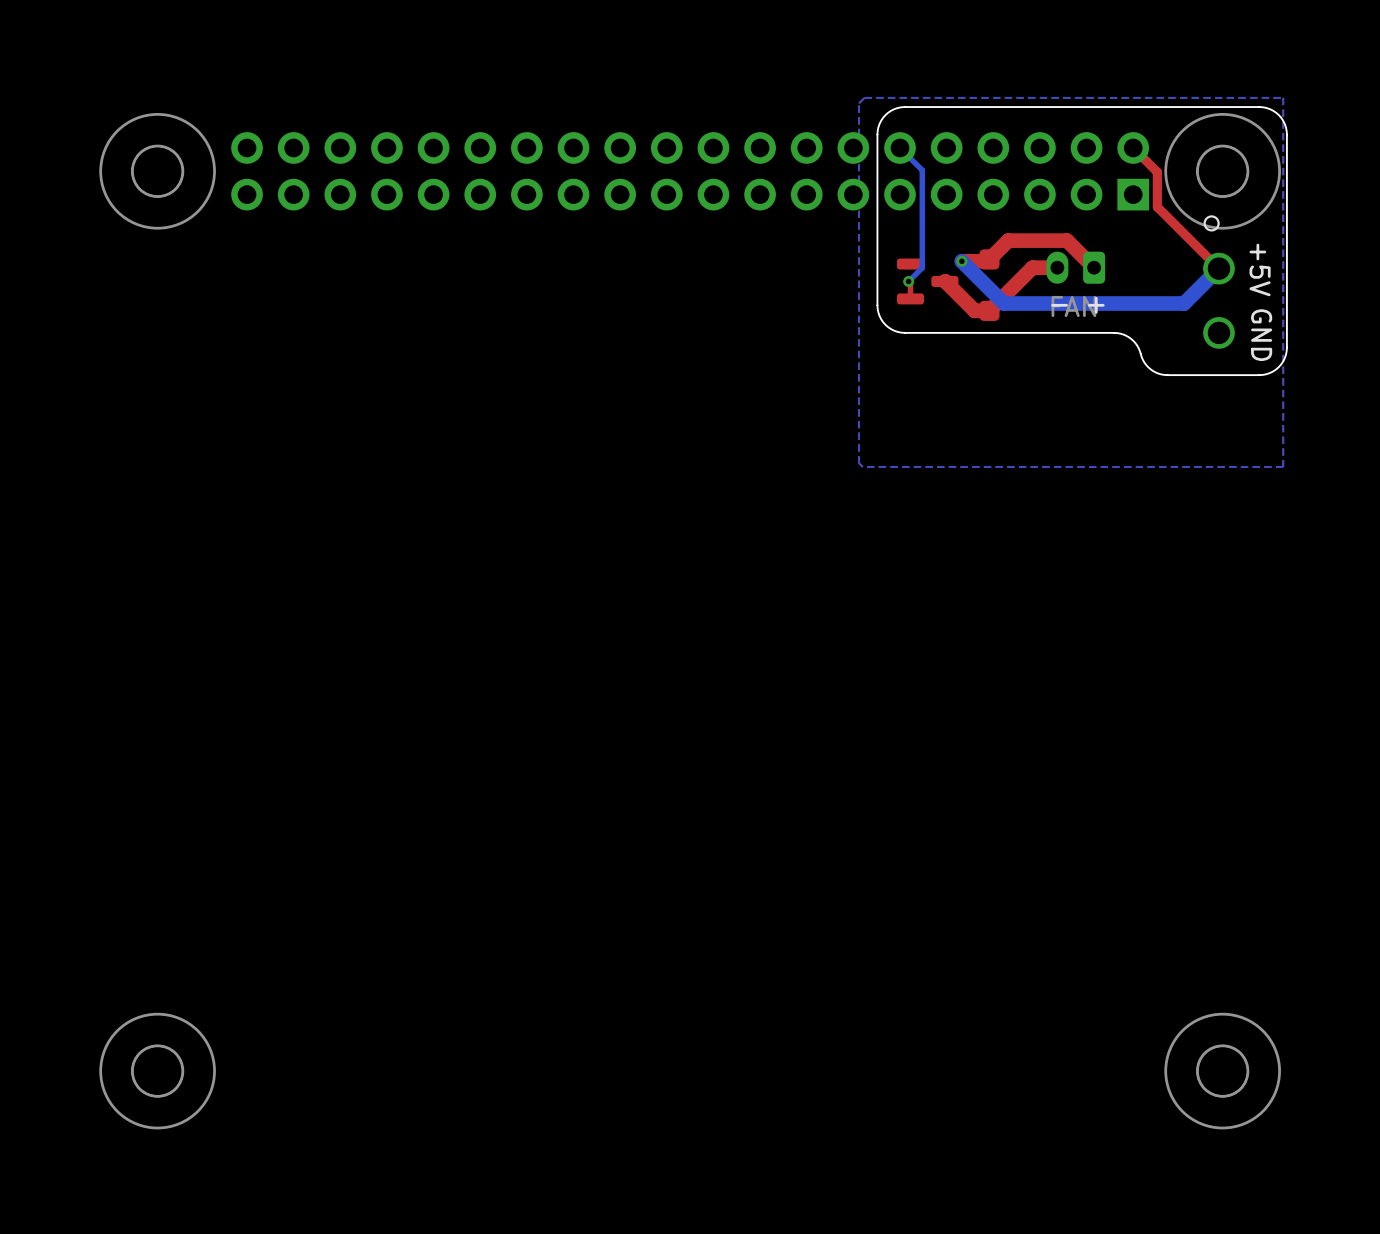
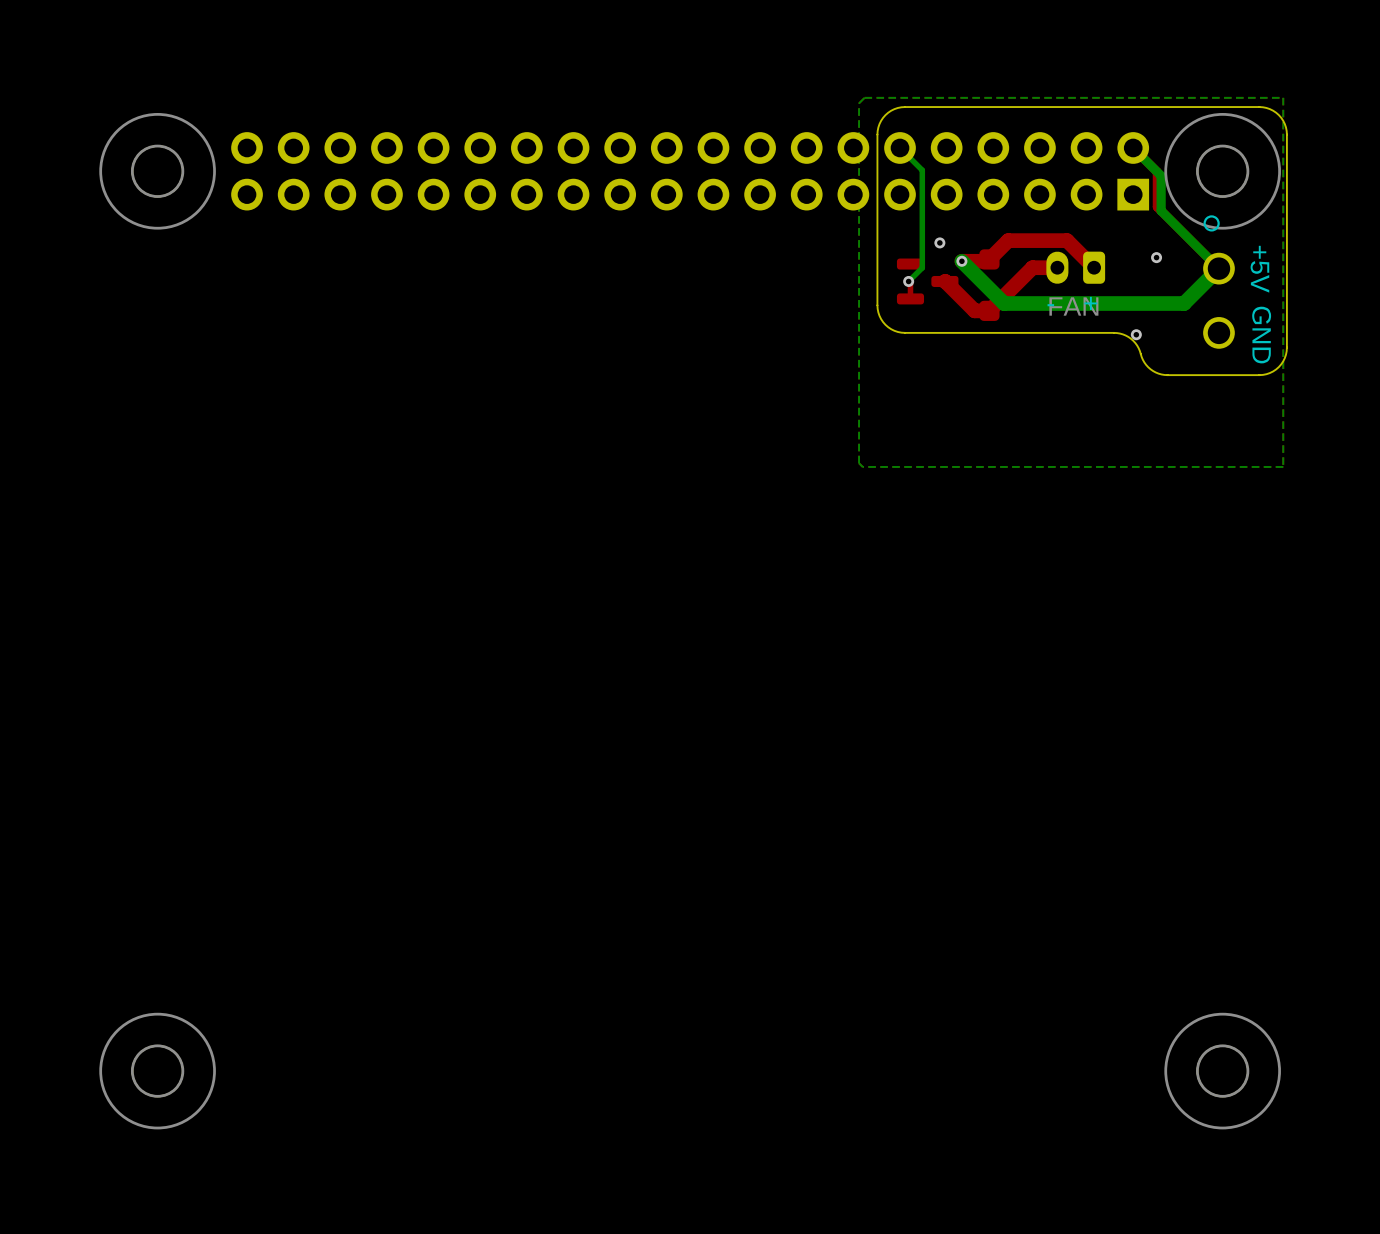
bottom track: none -> (1133, 147) (1161, 175) (1161, 210) (1218, 268)
via: none -> (939, 242)
via: none -> (1156, 257)
via: none -> (1136, 334)

